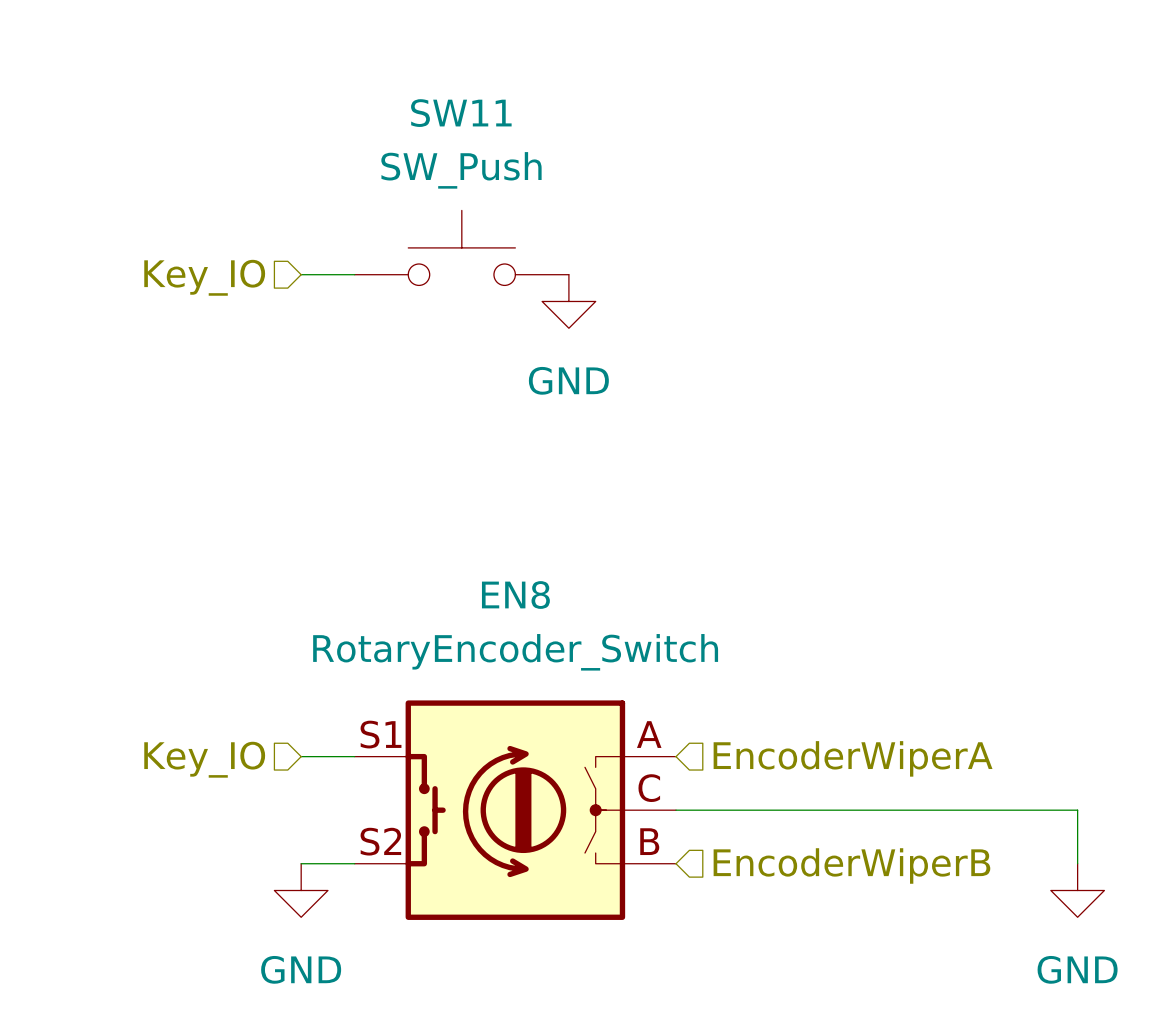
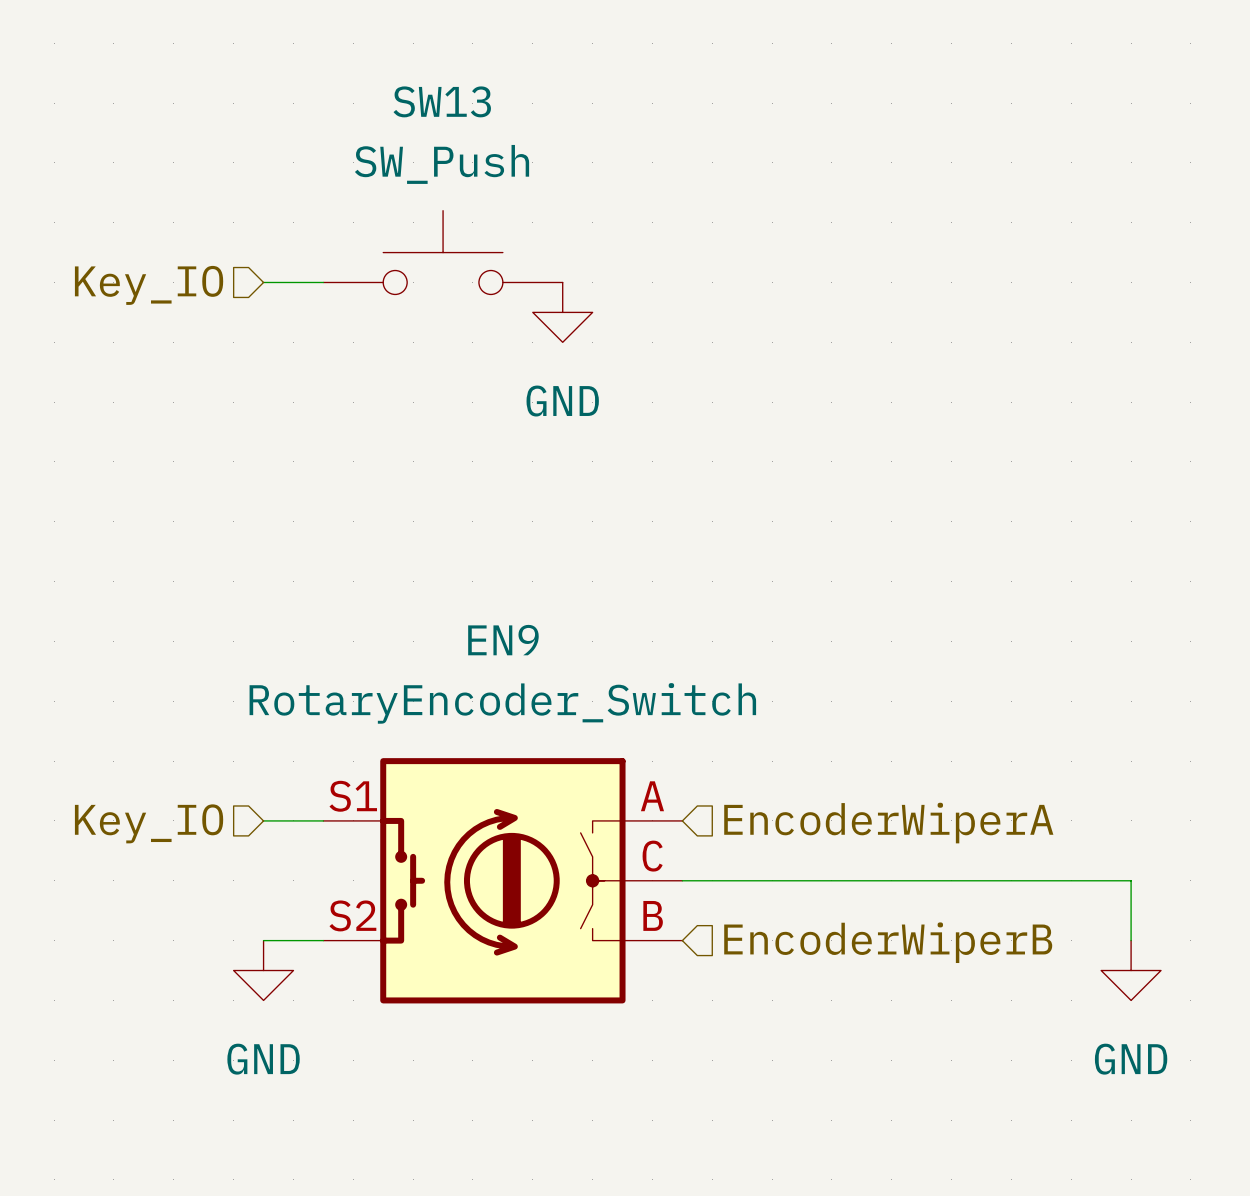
SW11 name: SW11 (461, 113) -> SW13 (442, 101)
EN8 name: EN8 (515, 595) -> EN9 (503, 640)

